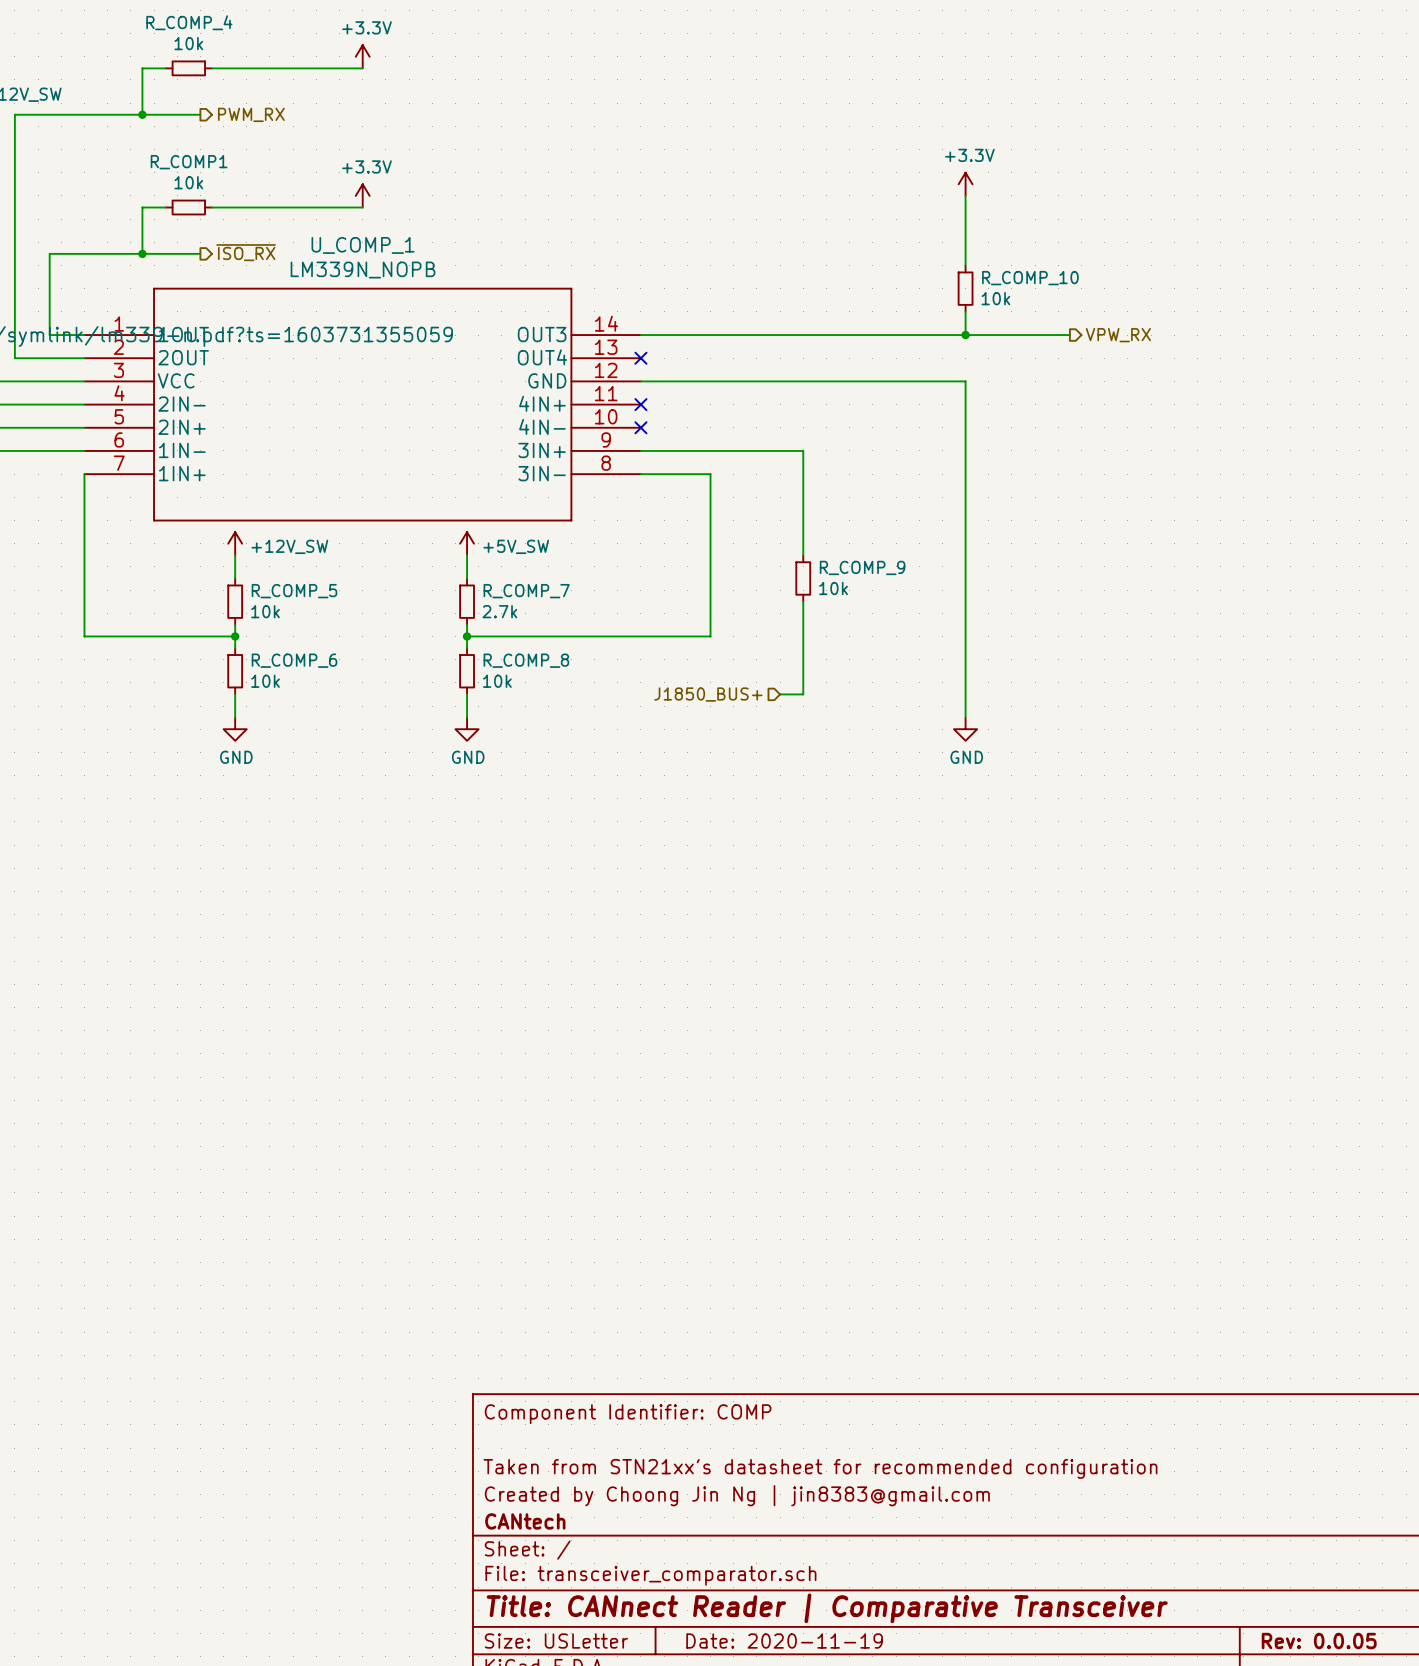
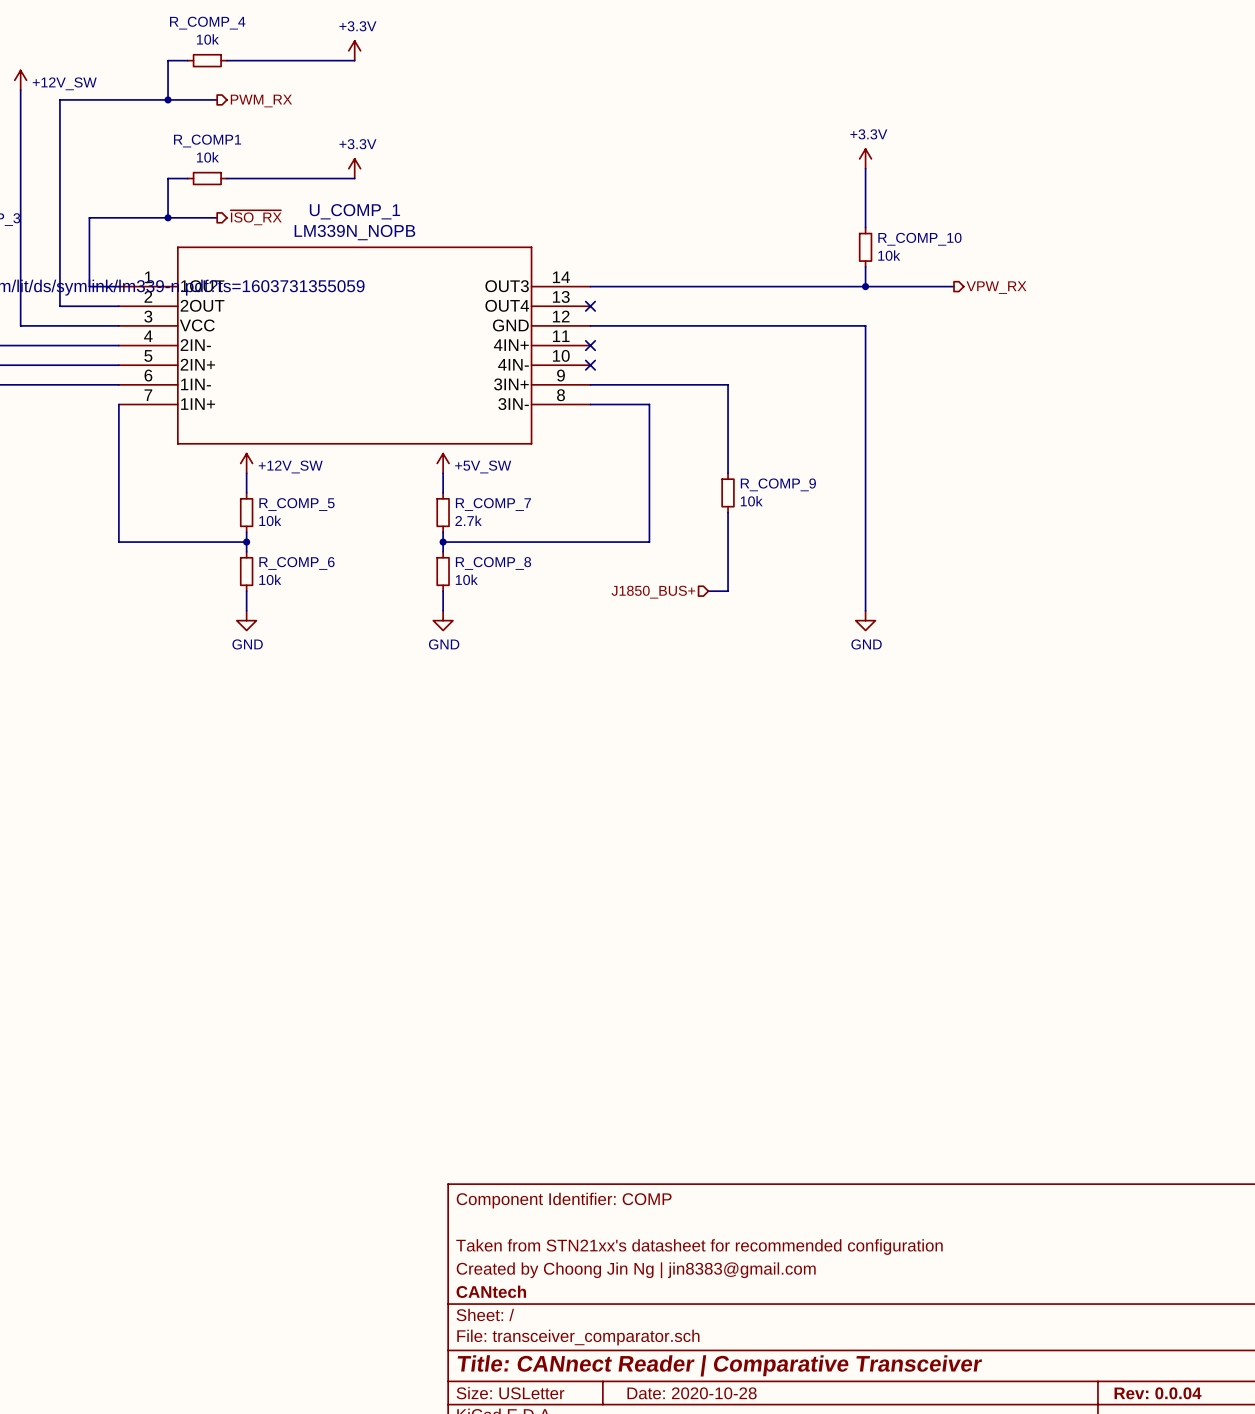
title block: Date: 2020-11-19 (784, 1641) -> Date: 2020-10-28 (692, 1393)
title block: Rev: 0.0.05 (1319, 1641) -> Rev: 0.0.04 (1158, 1393)

